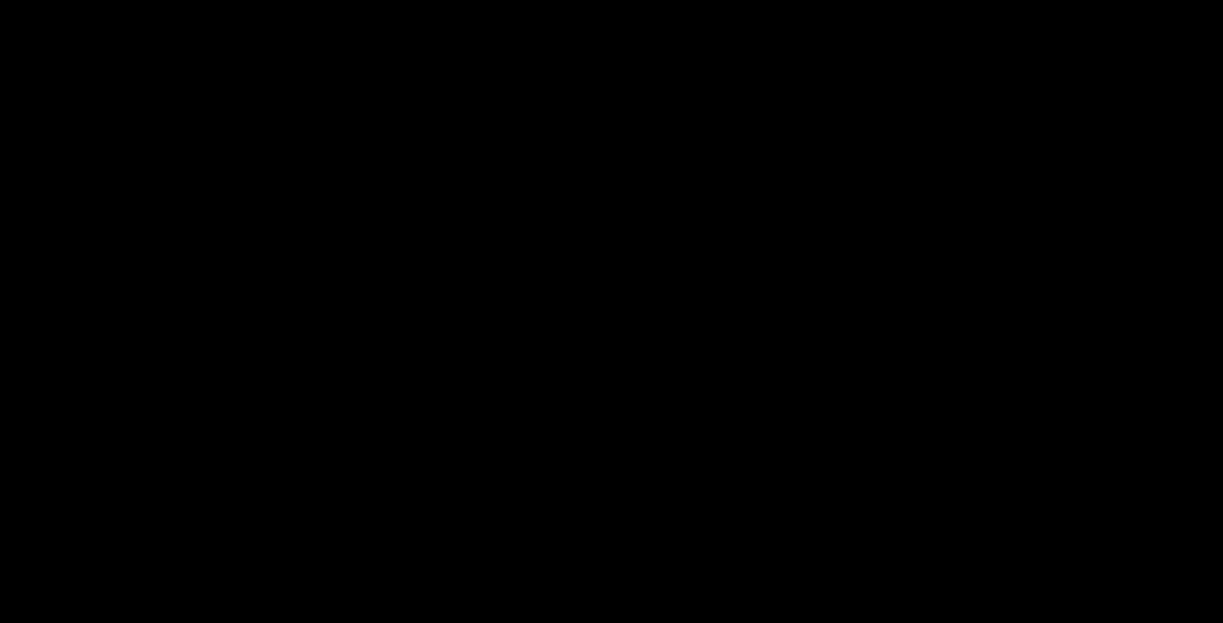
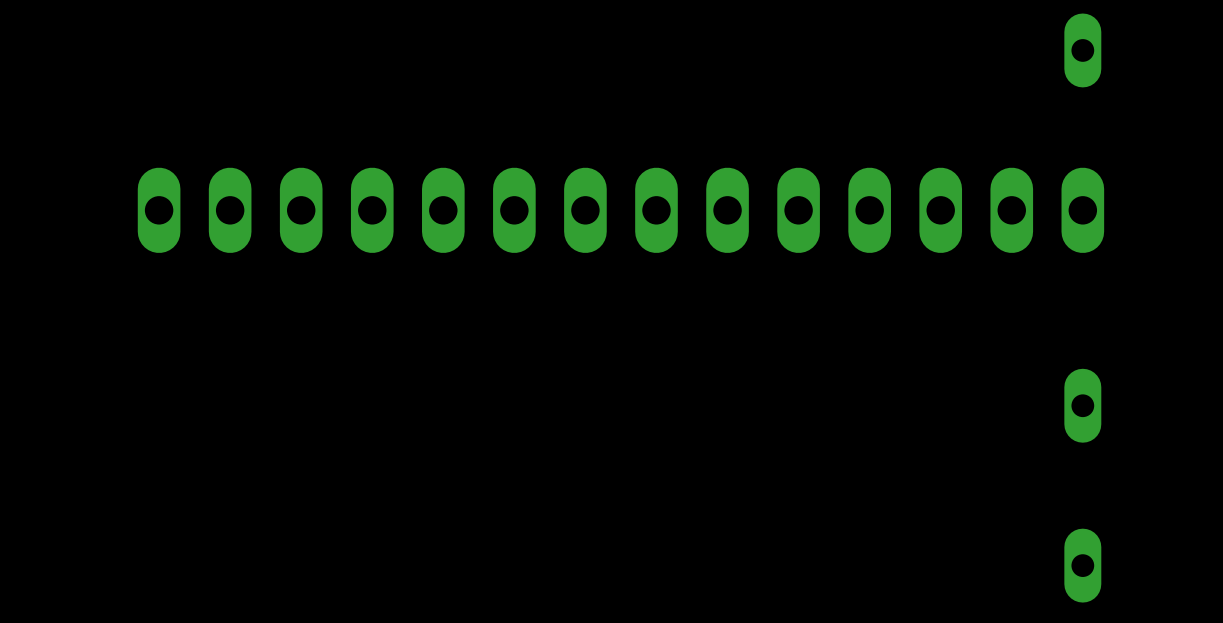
part: none -> (1082, 50)
part: none -> (620, 210)
part: none -> (1082, 405)
part: none -> (1082, 565)

